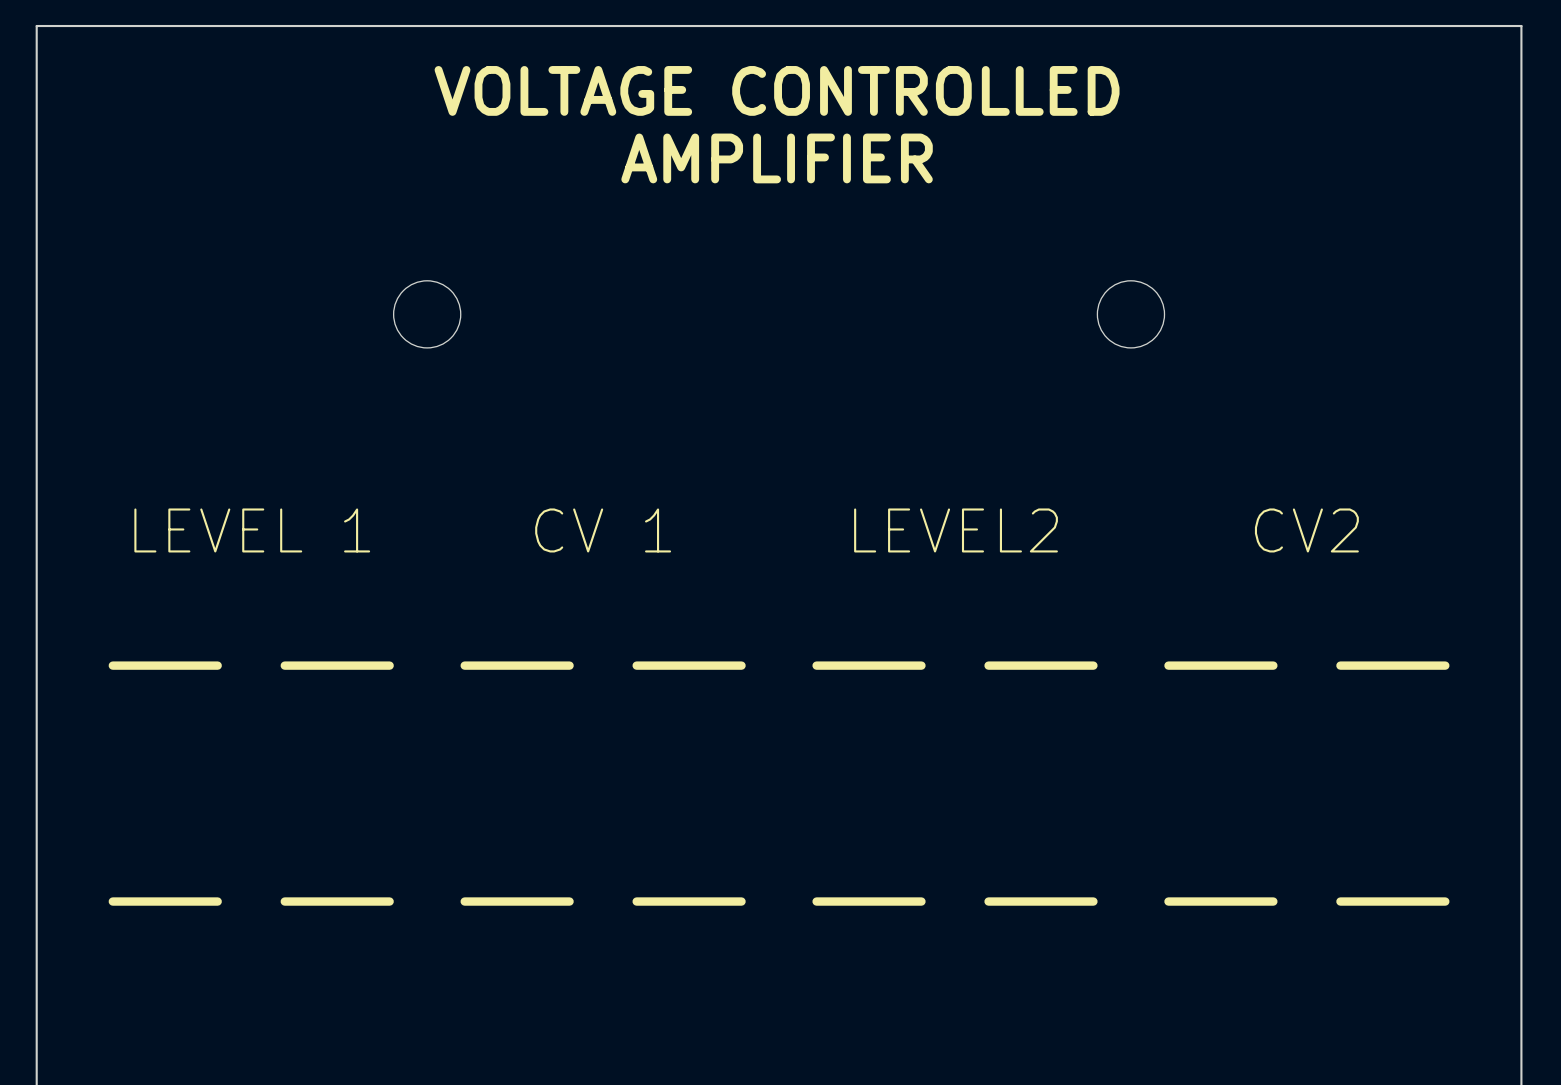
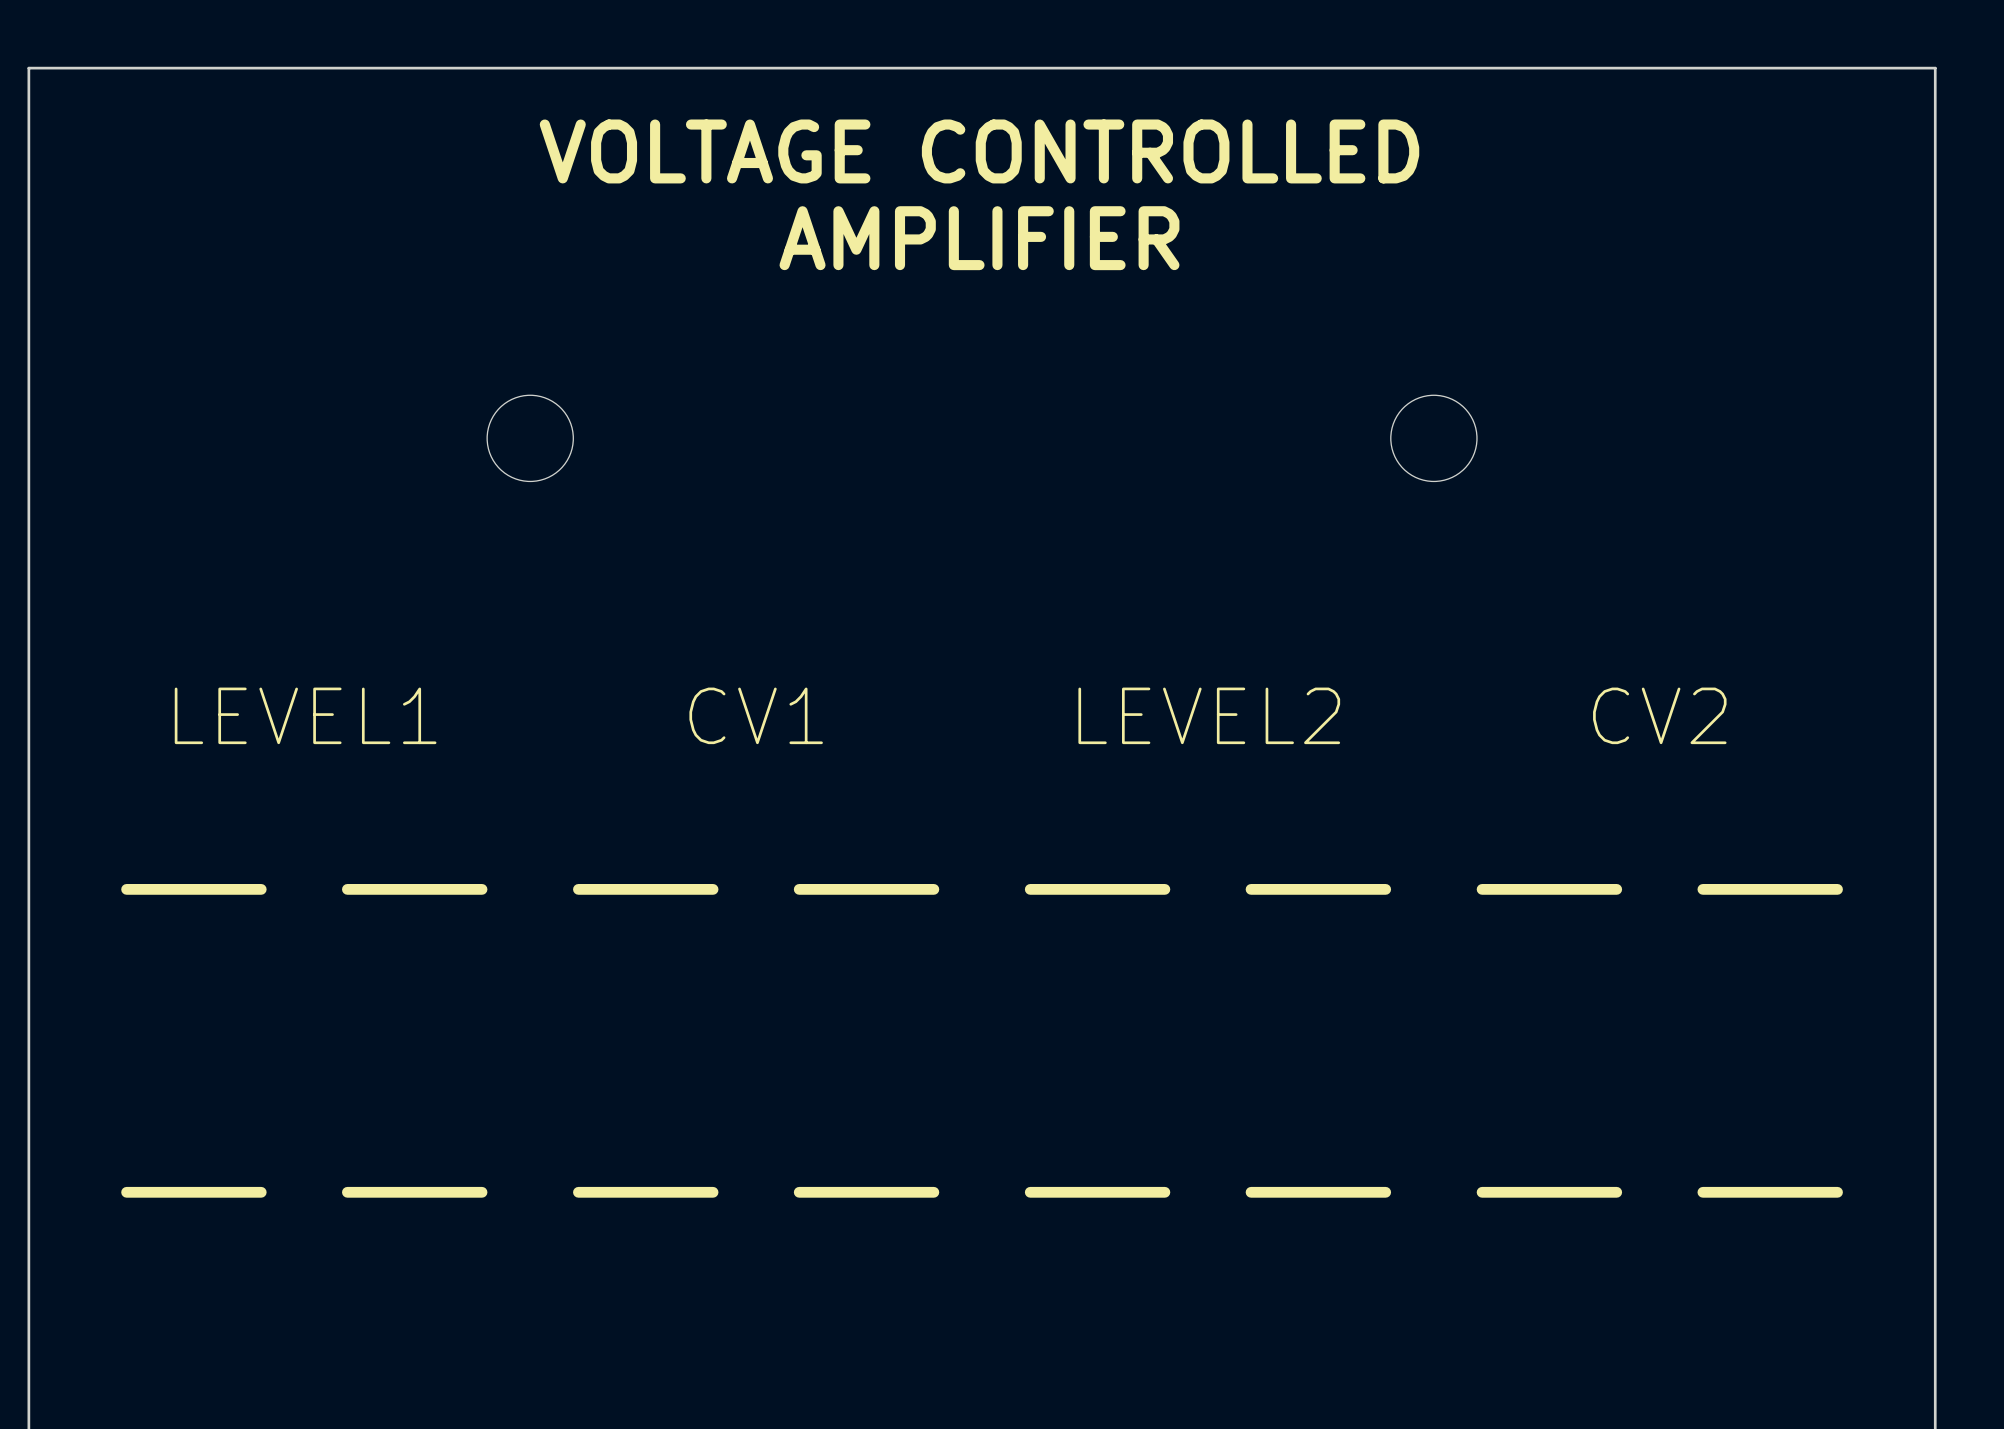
part text: LEVEL 1 (252, 530) -> LEVEL1 (305, 715)
part text: CV 1 (603, 530) -> CV1 (756, 715)

